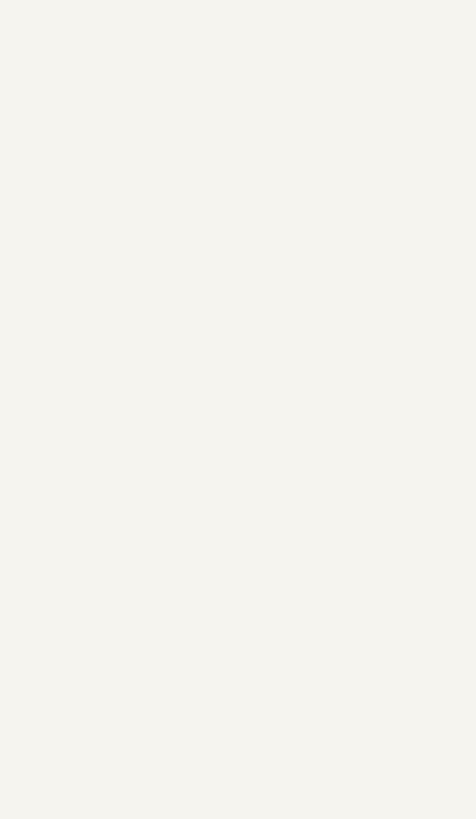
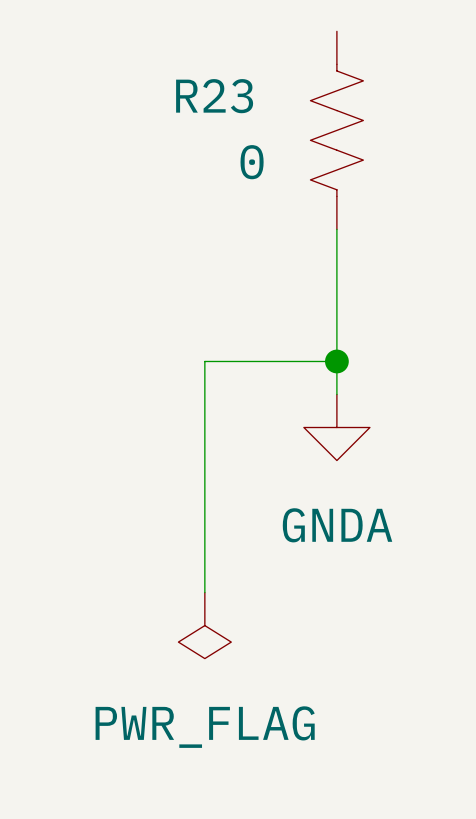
R23: none -> 0 (336, 130)
wire: none -> (336, 229) (336, 394)
wire: none -> (336, 361) (204, 361) (204, 592)
junction: none -> (336, 361)
power symbol: none -> GNDA (336, 427)
power symbol: none -> PWR_FLAG (204, 625)

